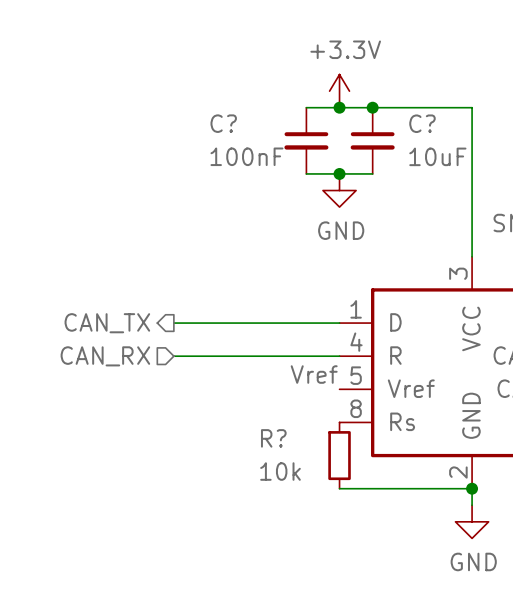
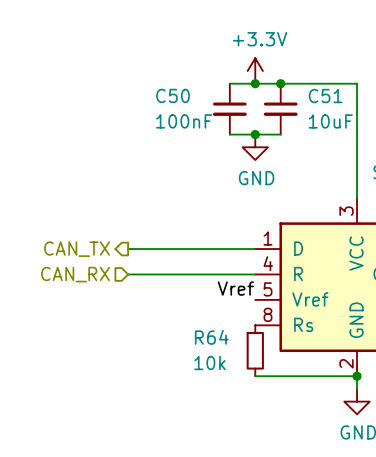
C? name: C? (223, 123) -> C50 (173, 95)
C? name: C? (422, 123) -> C51 (325, 96)
R? name: R? (273, 438) -> R64 (211, 337)

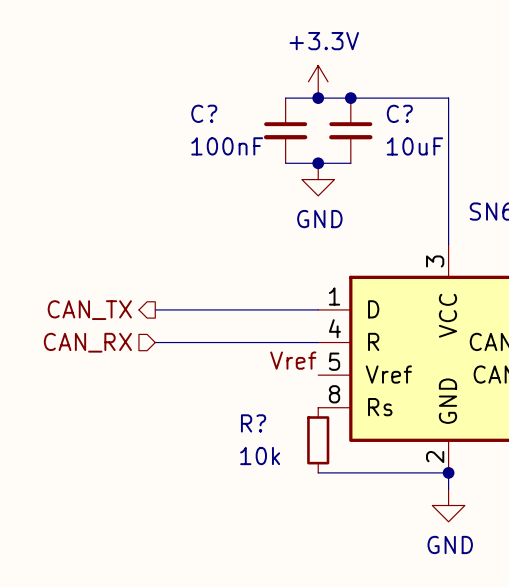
C50 name: C50 (173, 95) -> C? (204, 113)
C51 name: C51 (325, 96) -> C? (399, 113)
R64 name: R64 (211, 337) -> R? (253, 423)

